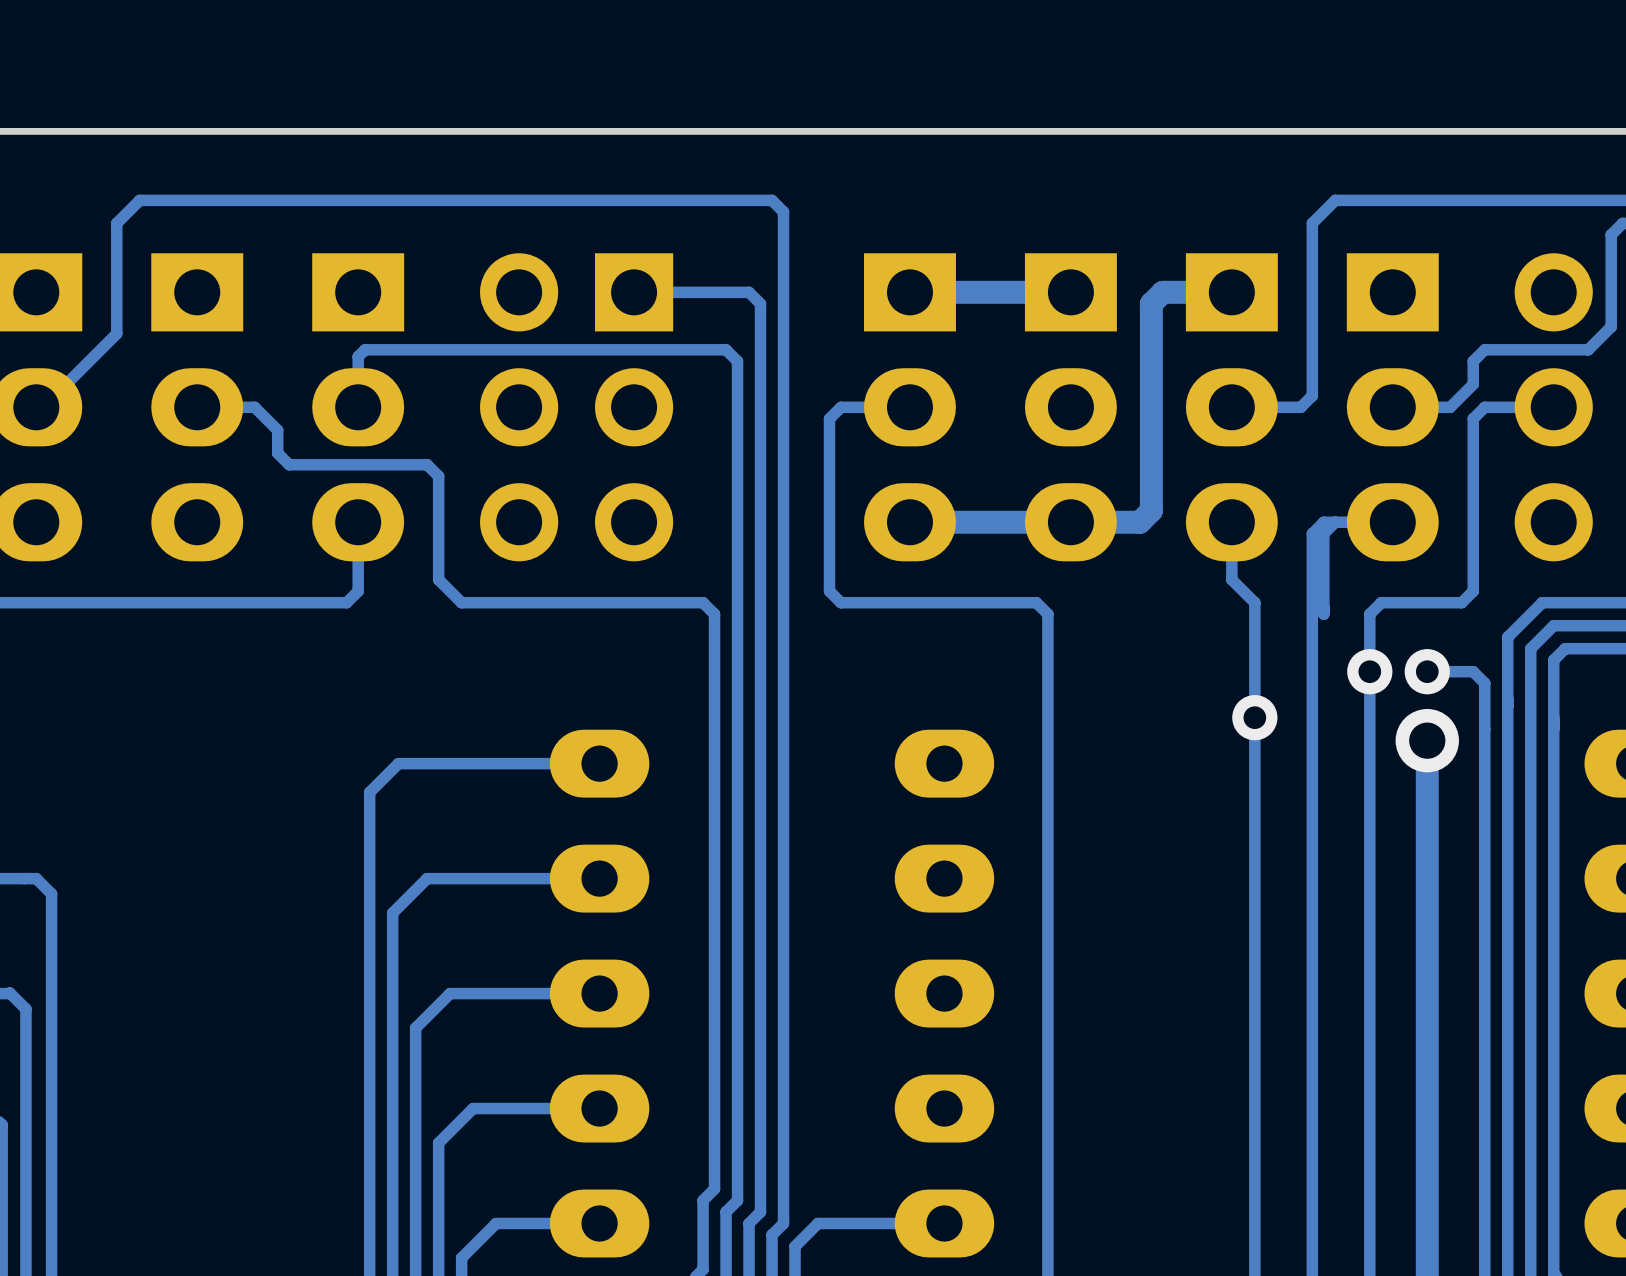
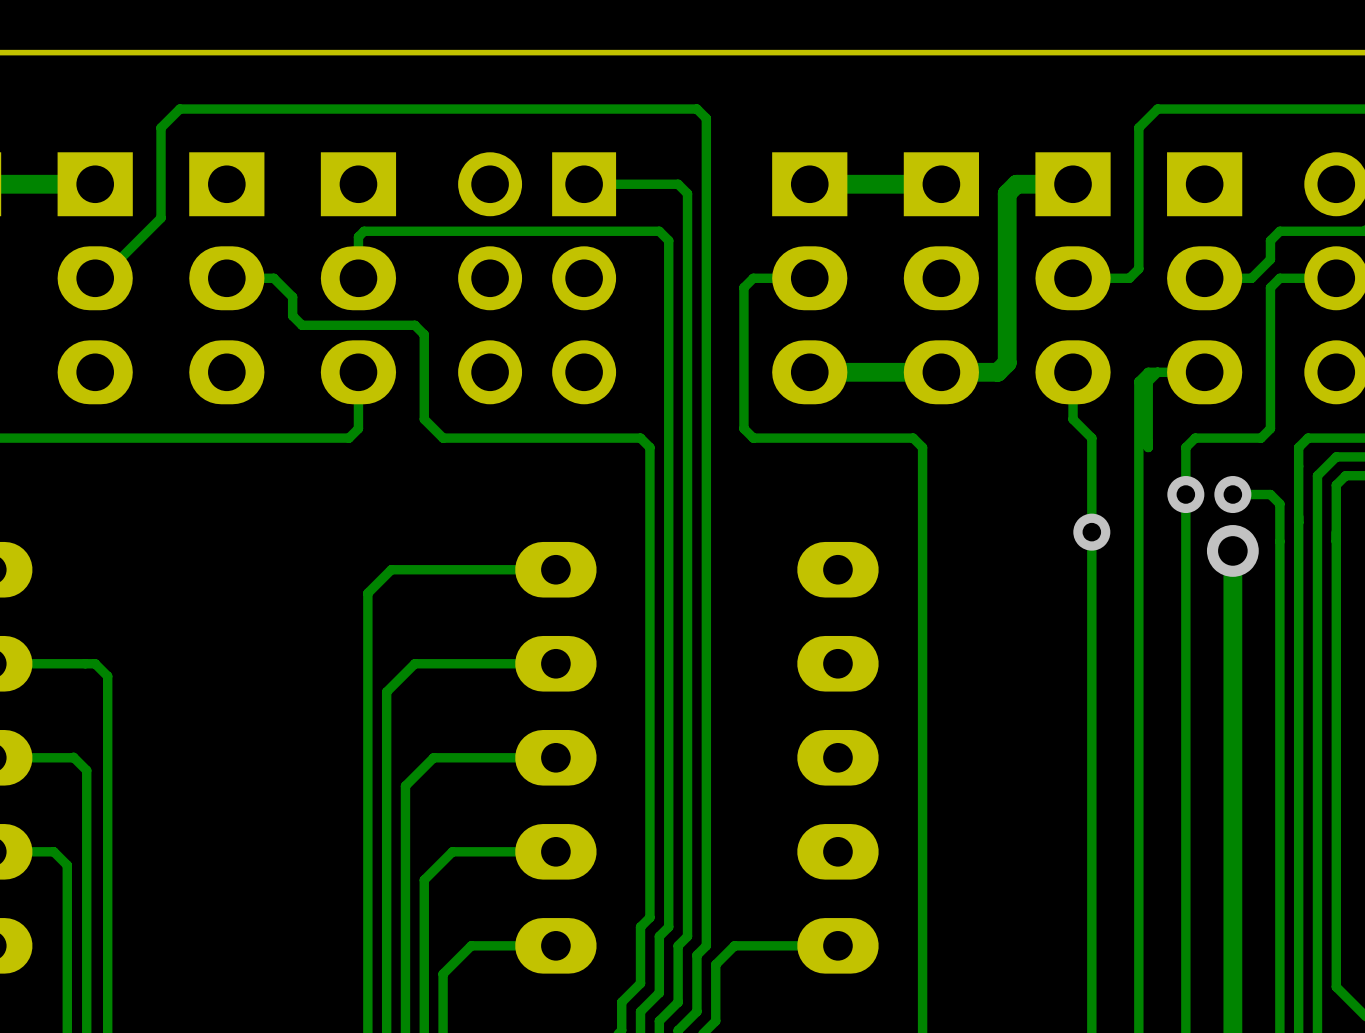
track: (1542, 602) (1507, 637) -> (1326, 438) (1308, 438) (1298, 447) (1298, 466)

